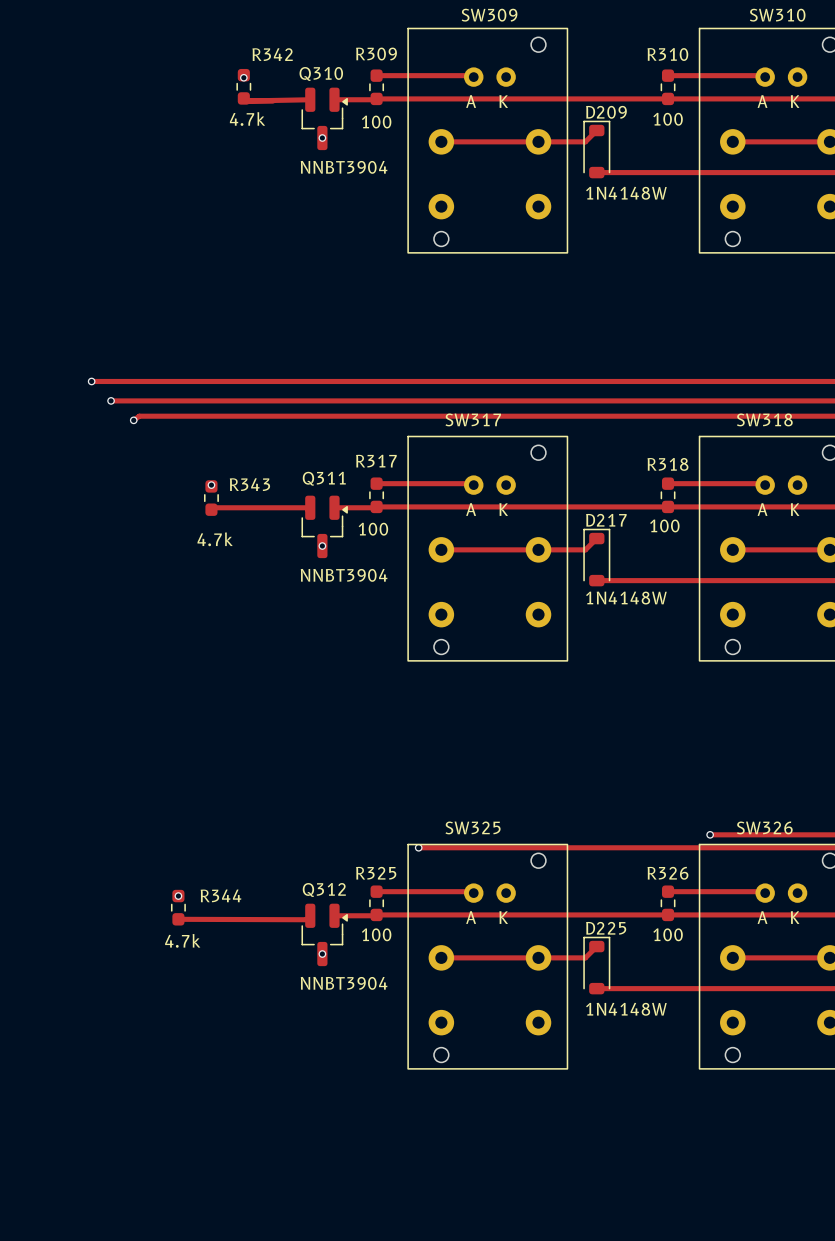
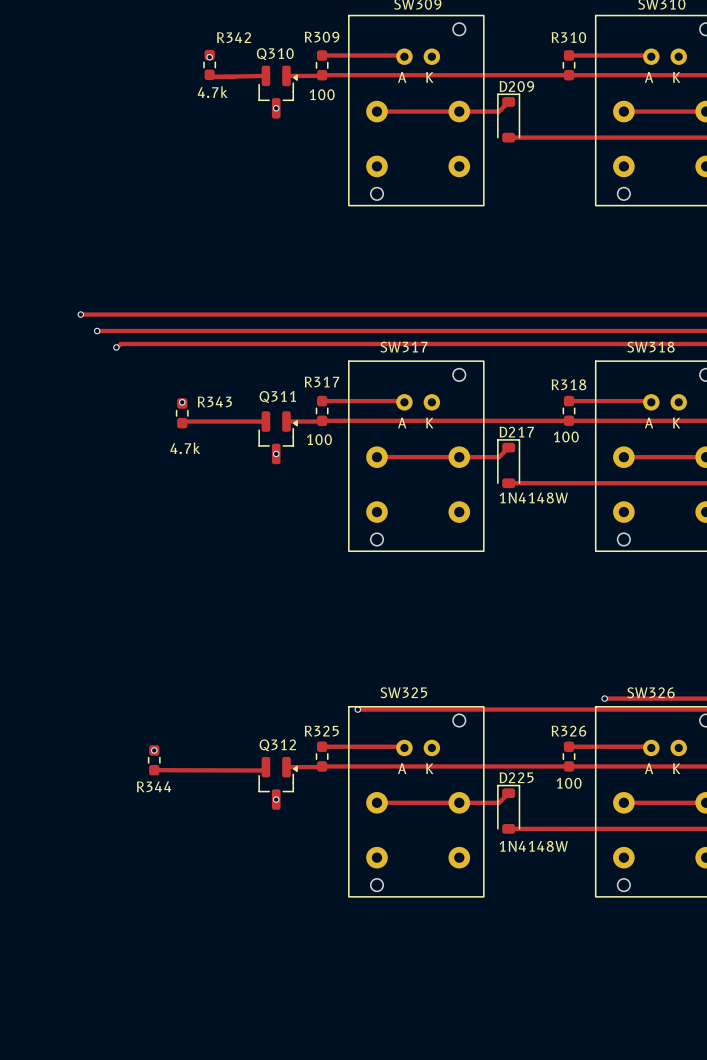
R310 value: 100 (668, 119) -> none
Q310 value: NNBT3904 (344, 167) -> none
D209 value: 1N4148W (626, 193) -> none
Q311 value: NNBT3904 (344, 575) -> none
R344 name position: R344 (220, 895) -> R344 (154, 786)
R325 value: 100 (376, 934) -> none
R344 value: 4.7k (182, 940) -> none
Q312 value: NNBT3904 (344, 983) -> none

